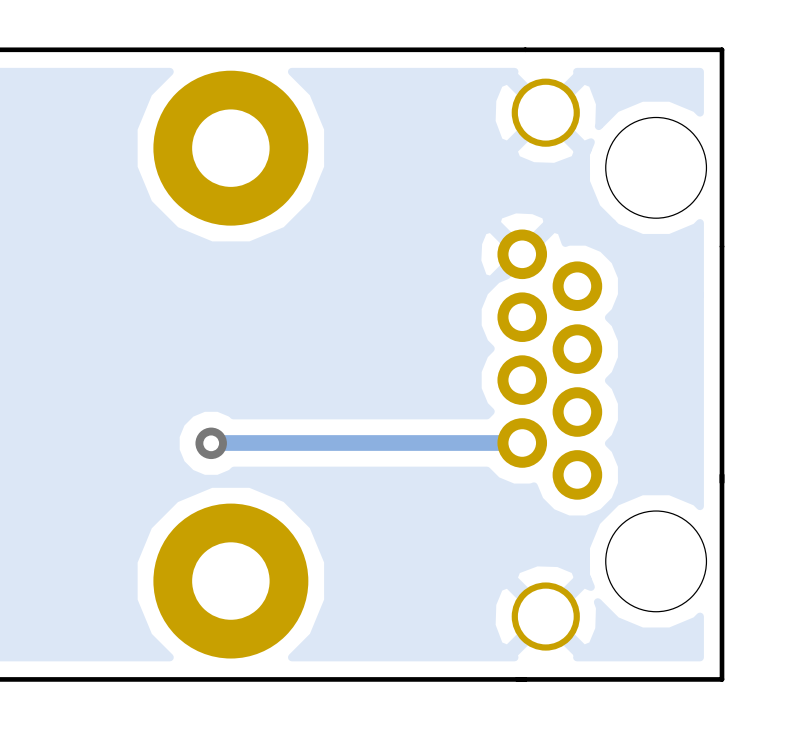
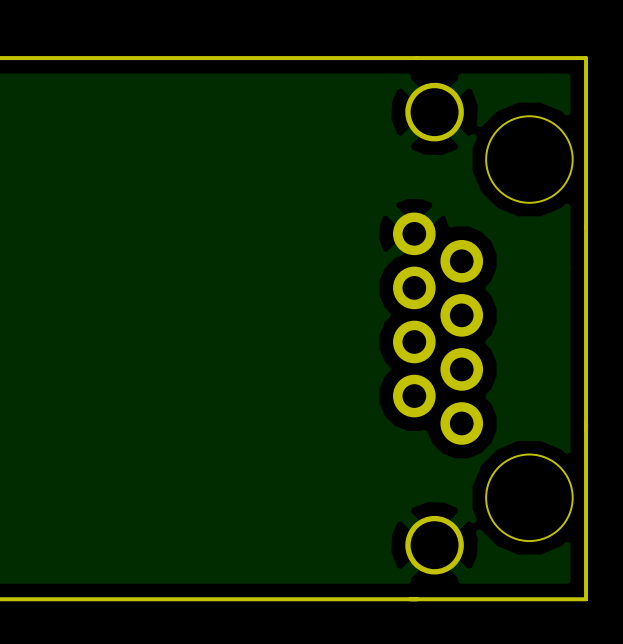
part: (230, 148) -> none
via: (211, 443) -> none
track: (522, 443) (211, 443) -> none
part: (230, 581) -> none

